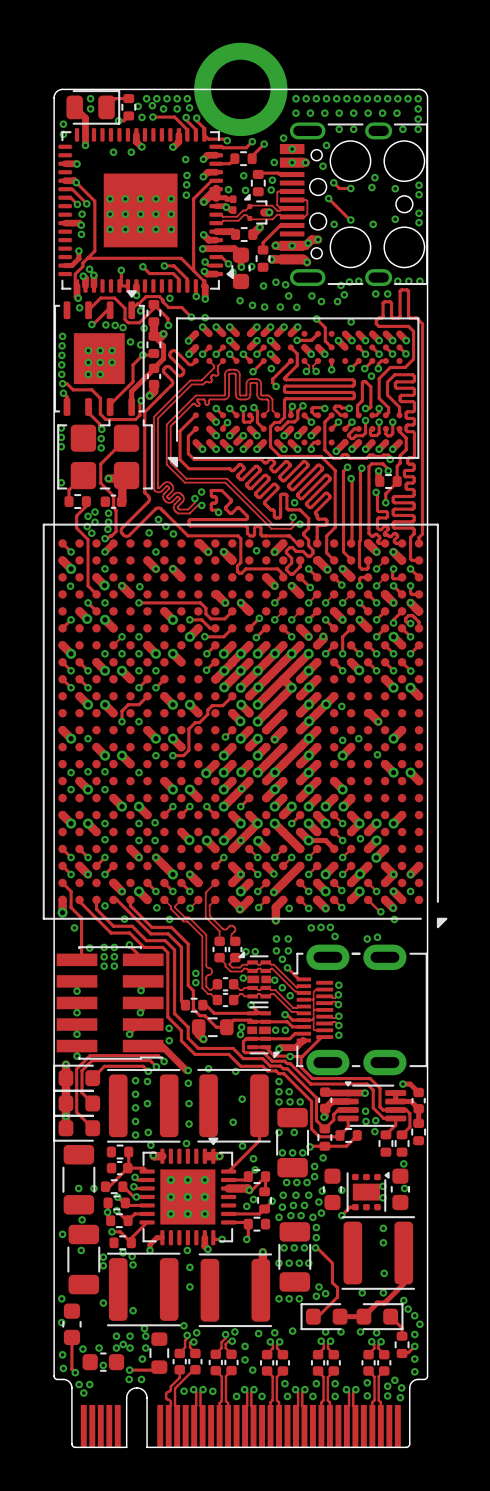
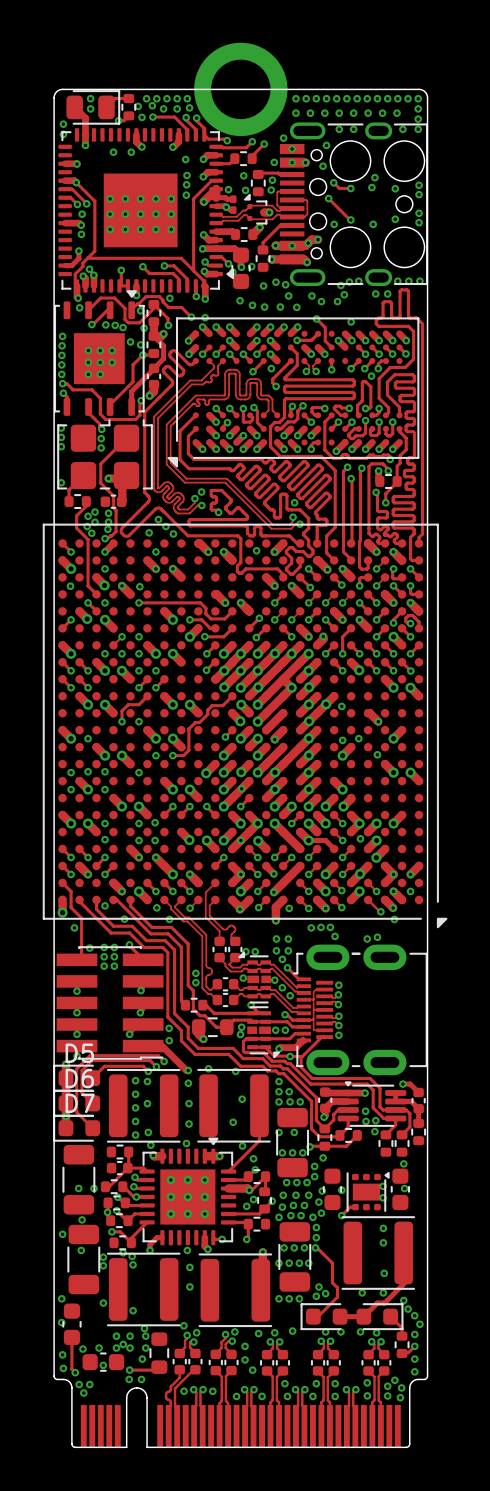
D5 name: none -> D5 (79, 1053)
D6 name: none -> D6 (79, 1078)
D7 name: none -> D7 (80, 1103)

